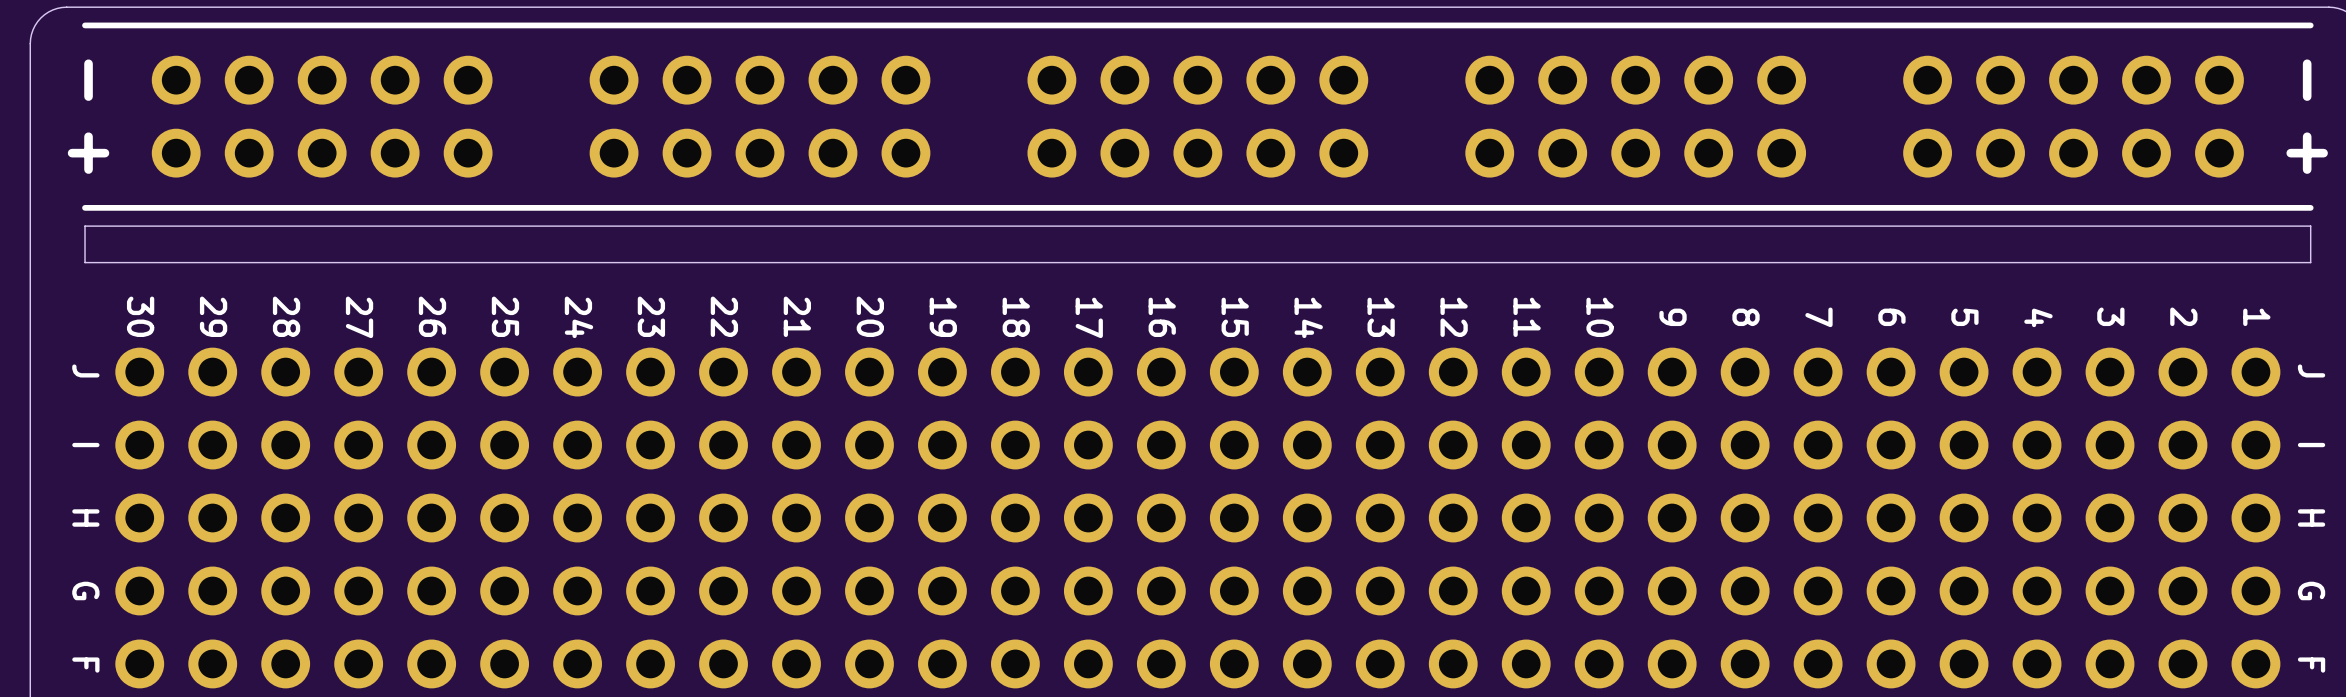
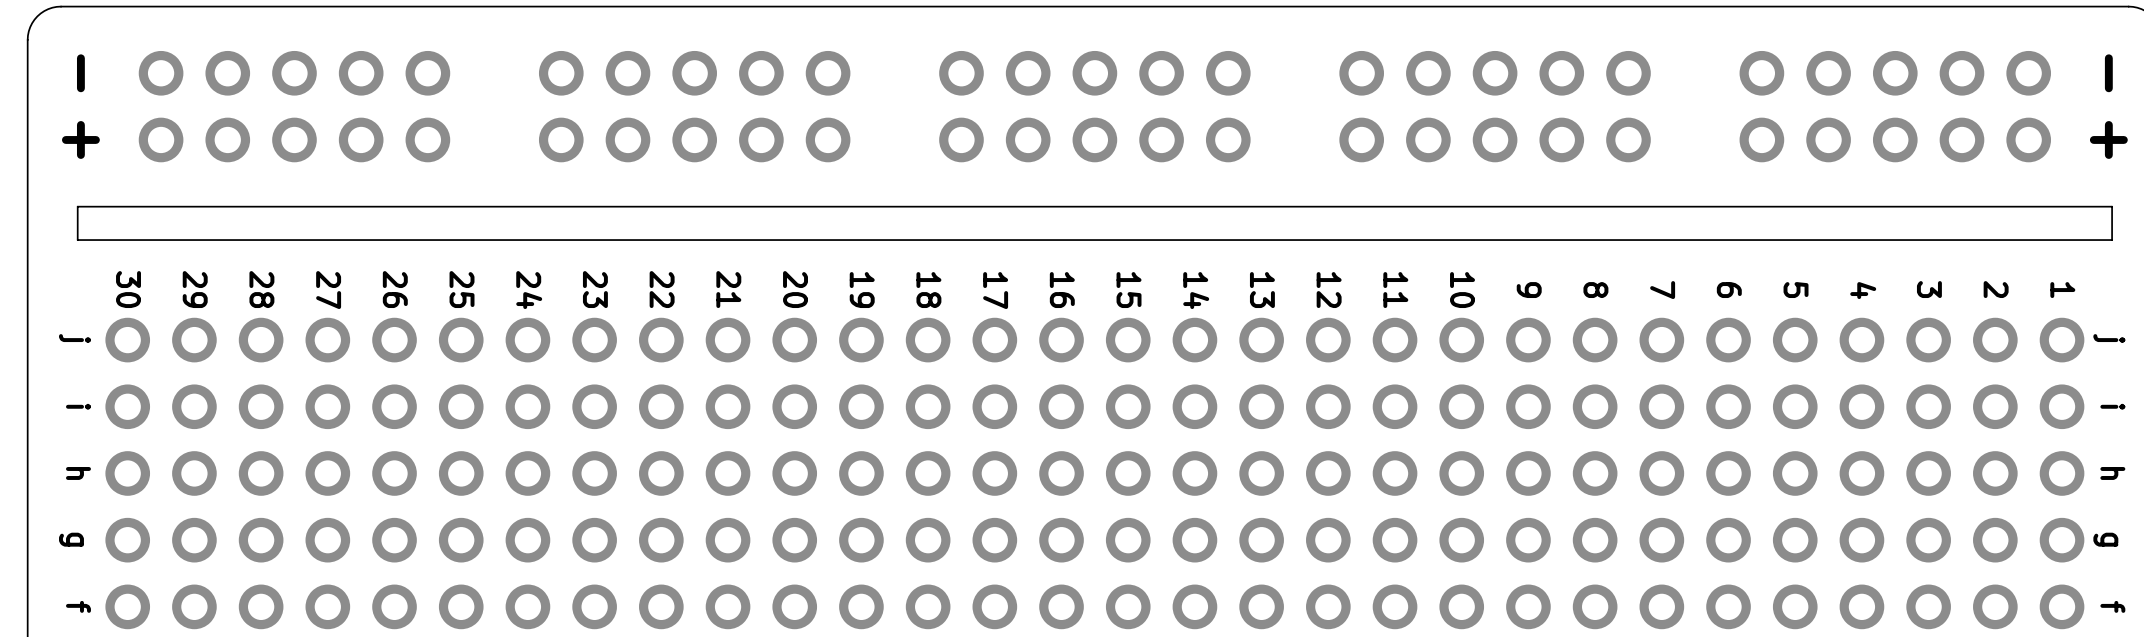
line: (2310, 25) (85, 25) -> none
line: (2310, 207) (85, 207) -> none
text: J (85, 370) -> j (74, 338)
text: J (2311, 370) -> j (2109, 338)
text: I (85, 445) -> i (78, 406)
text: I (2311, 445) -> i (2112, 406)
text: H (85, 518) -> h (78, 473)
text: H (2311, 518) -> h (2112, 473)
text: G (85, 590) -> g (71, 539)
text: G (2311, 590) -> g (2105, 539)
text: F (85, 665) -> f (78, 606)
text: F (2311, 665) -> f (2112, 606)

